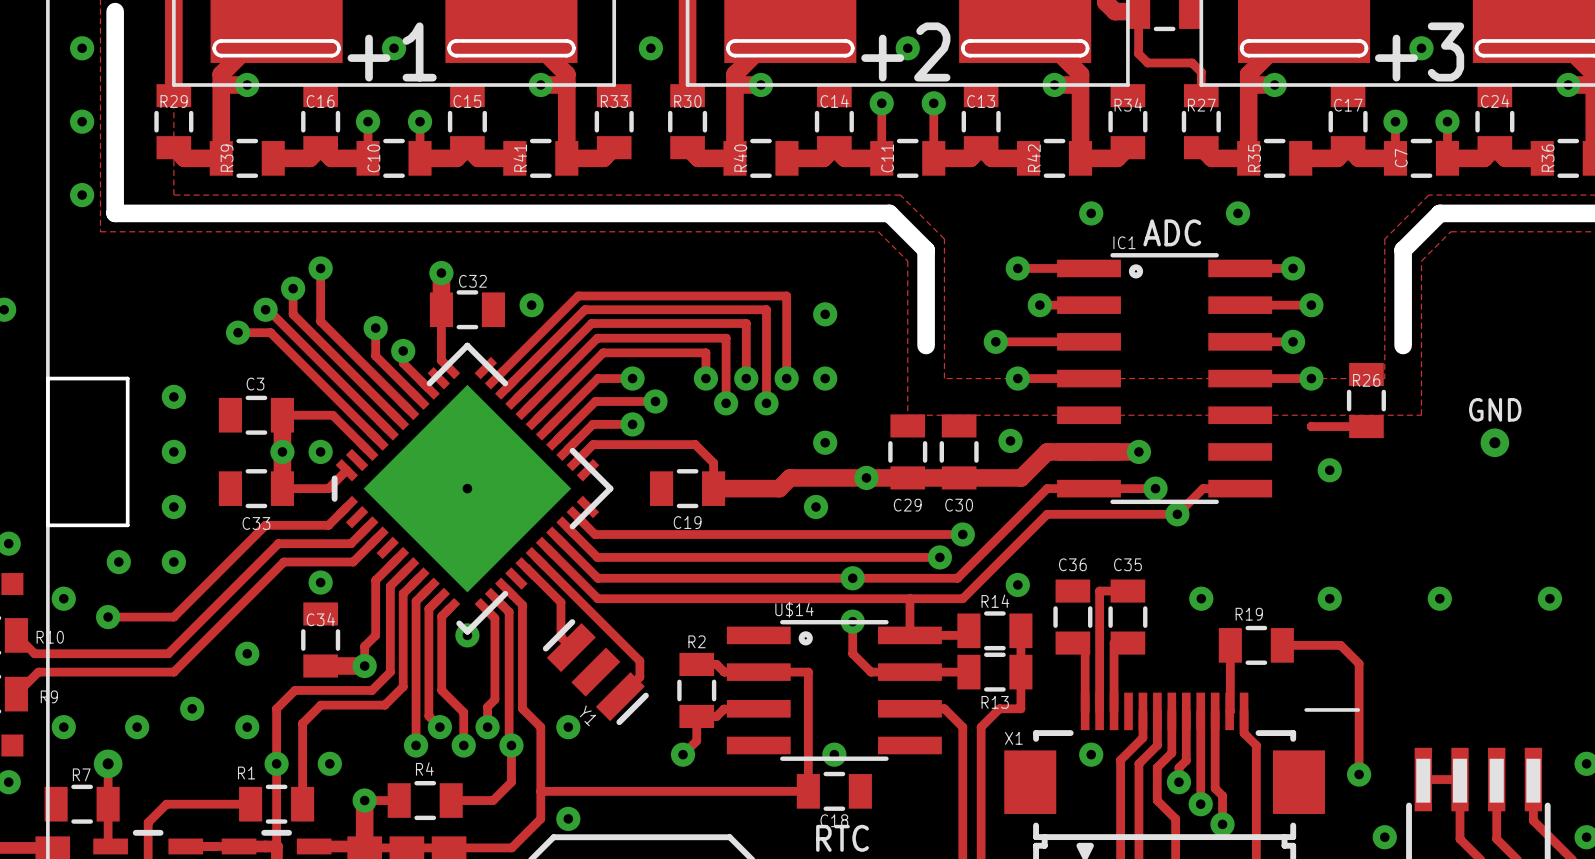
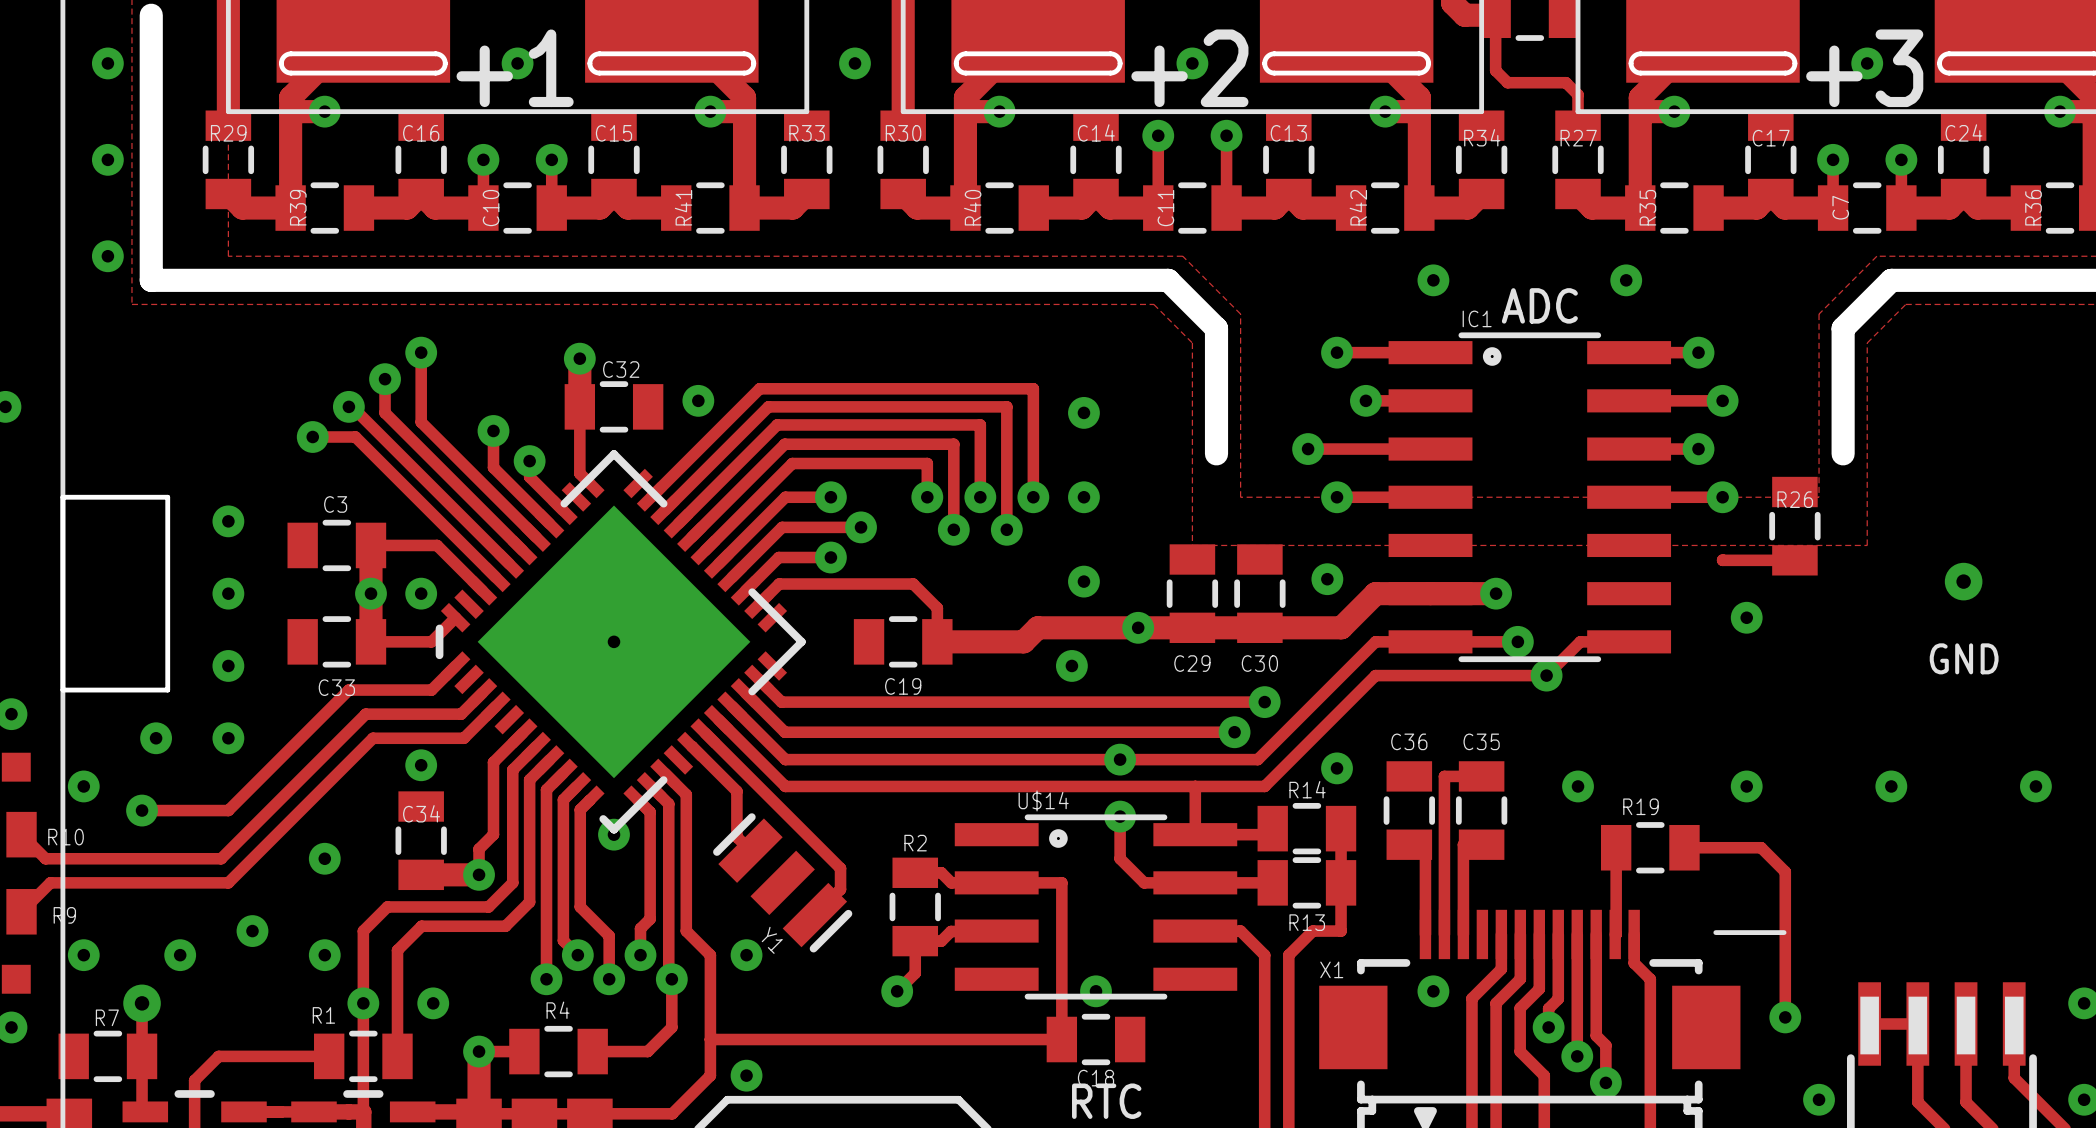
text position: GND (1495, 409) -> GND (1964, 658)

